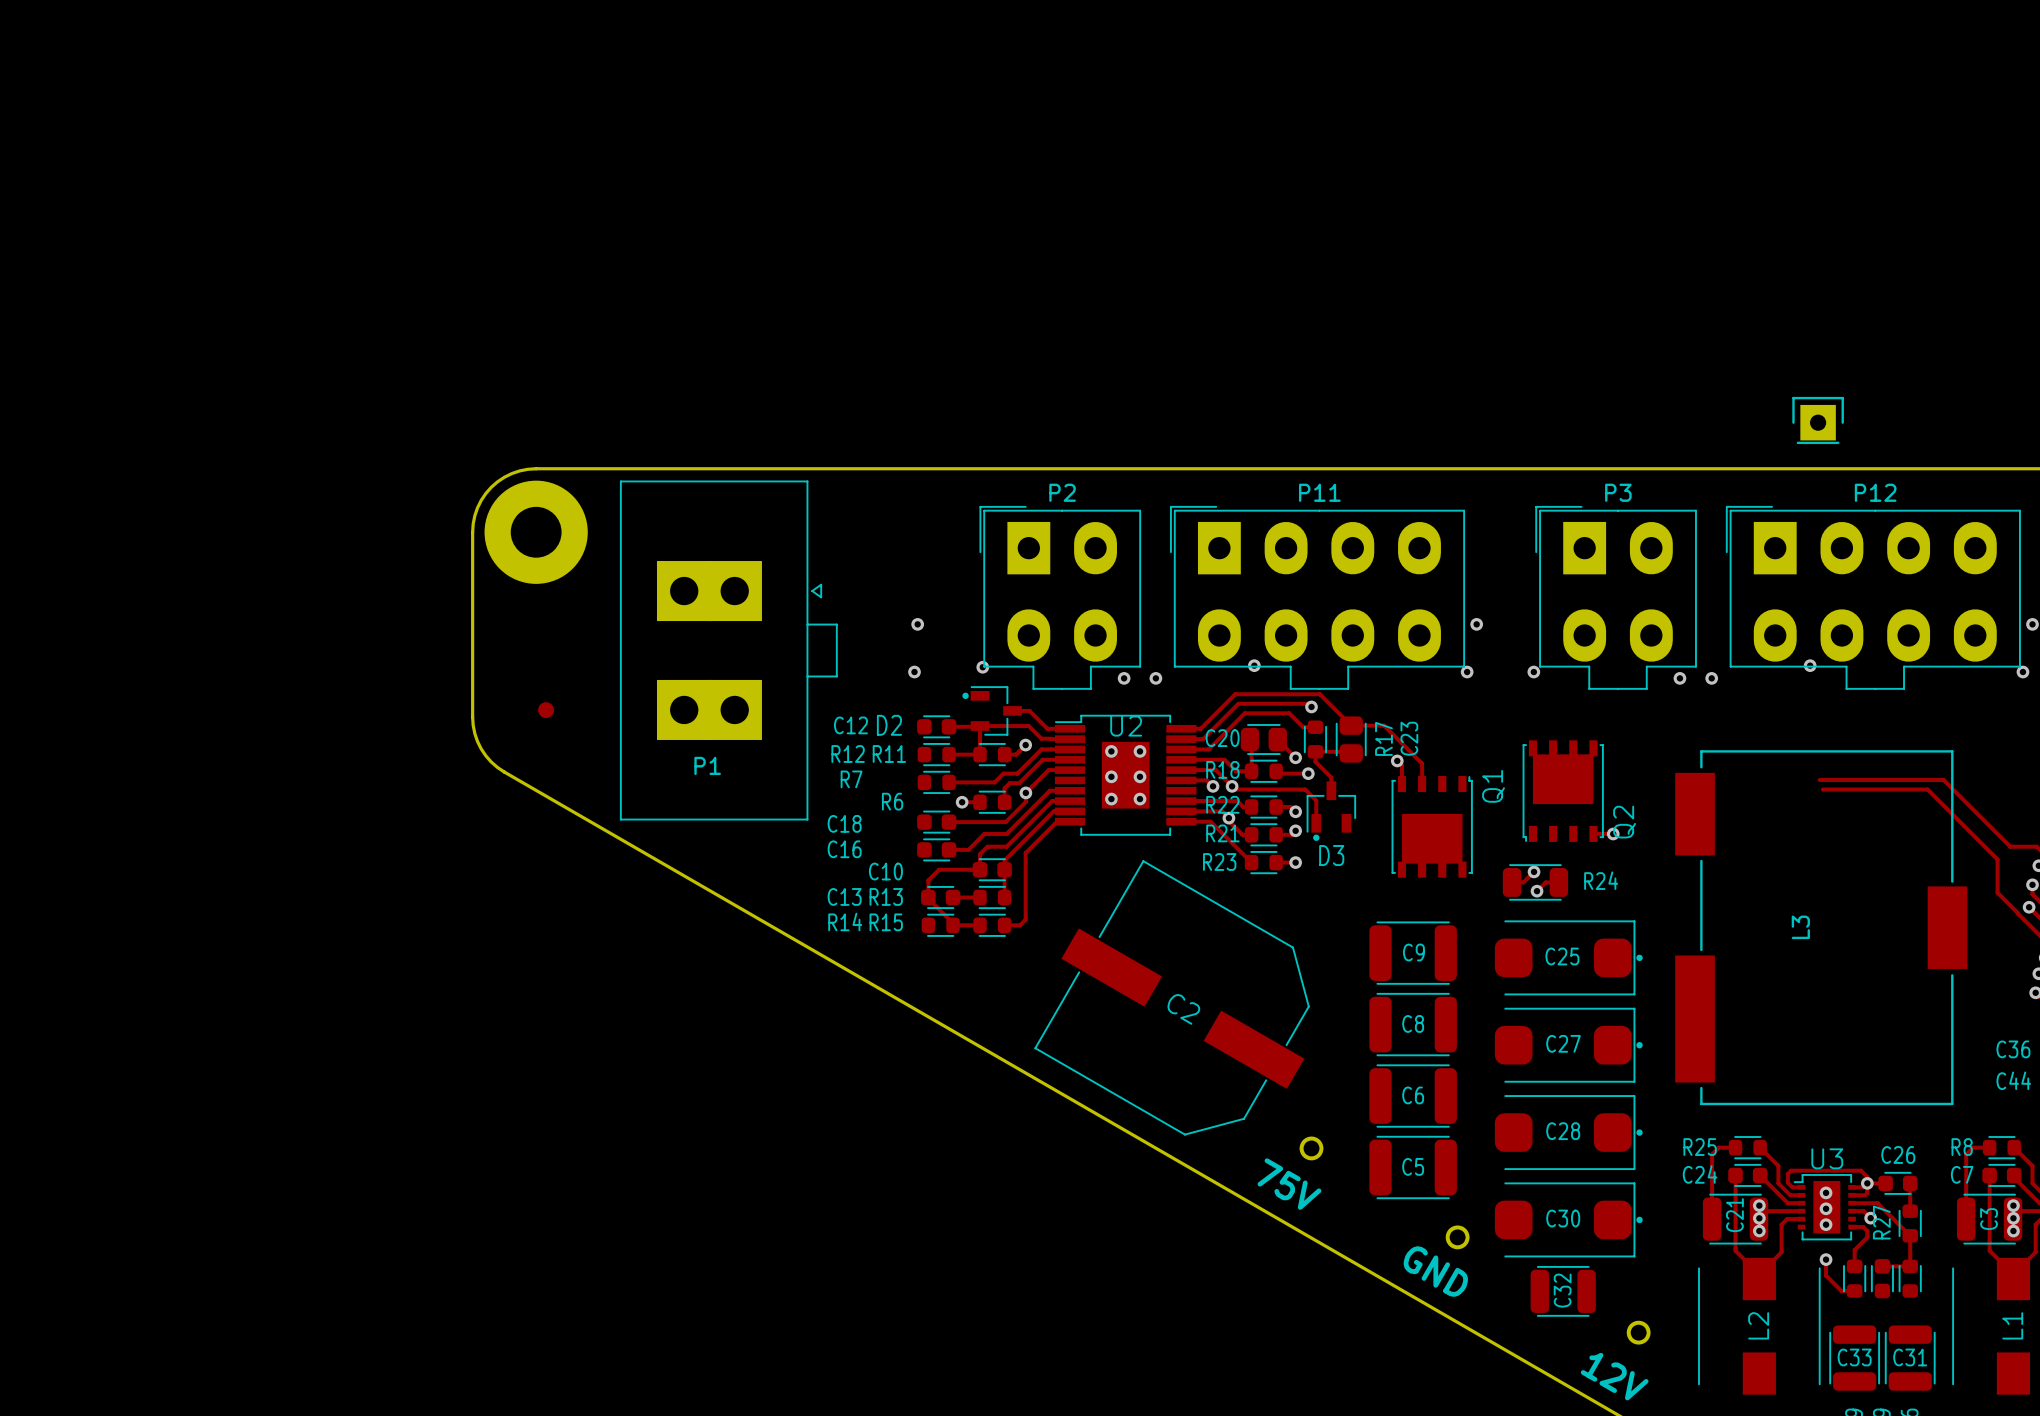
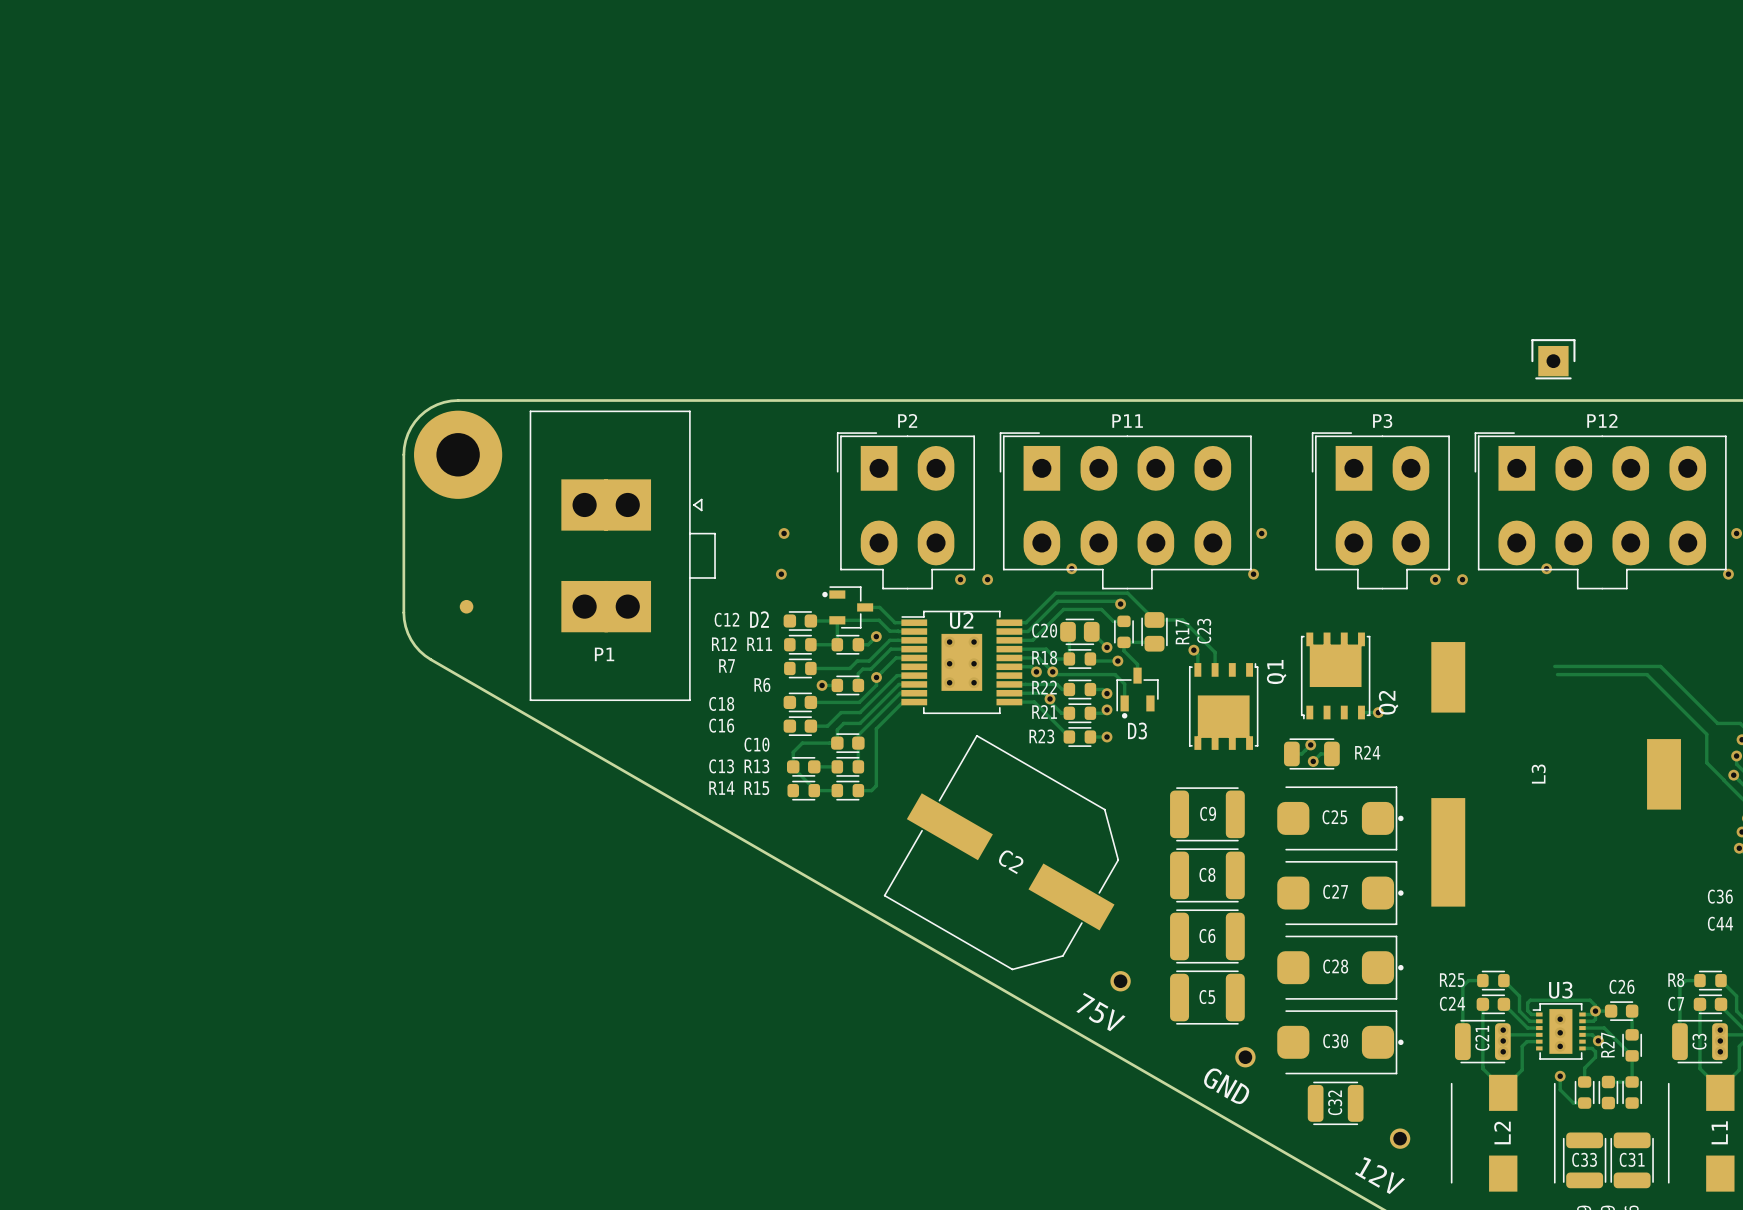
via: (982, 667) -> none
via: (1533, 672) -> none
L3 footprint: [1675, 750, 1968, 1106] -> [1431, 642, 1681, 907]

